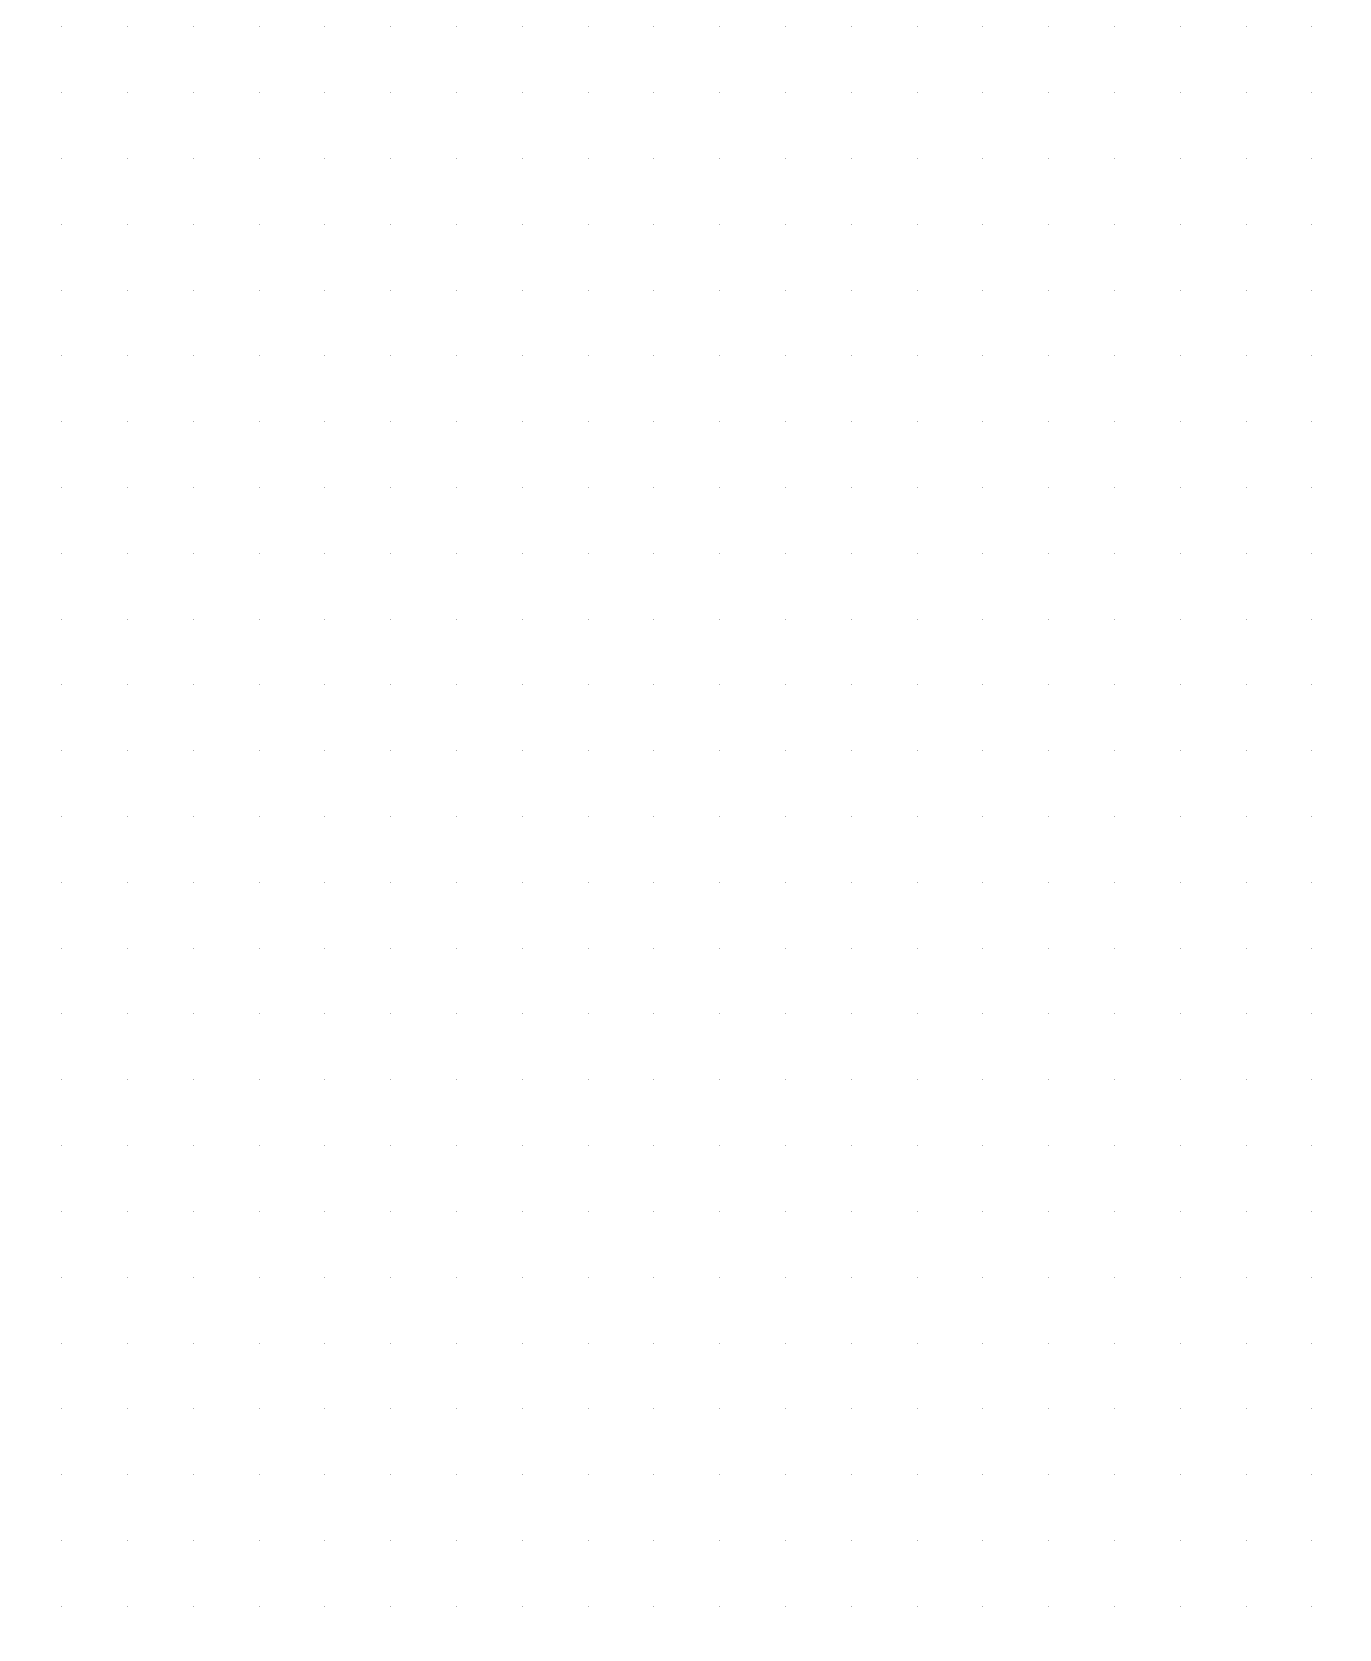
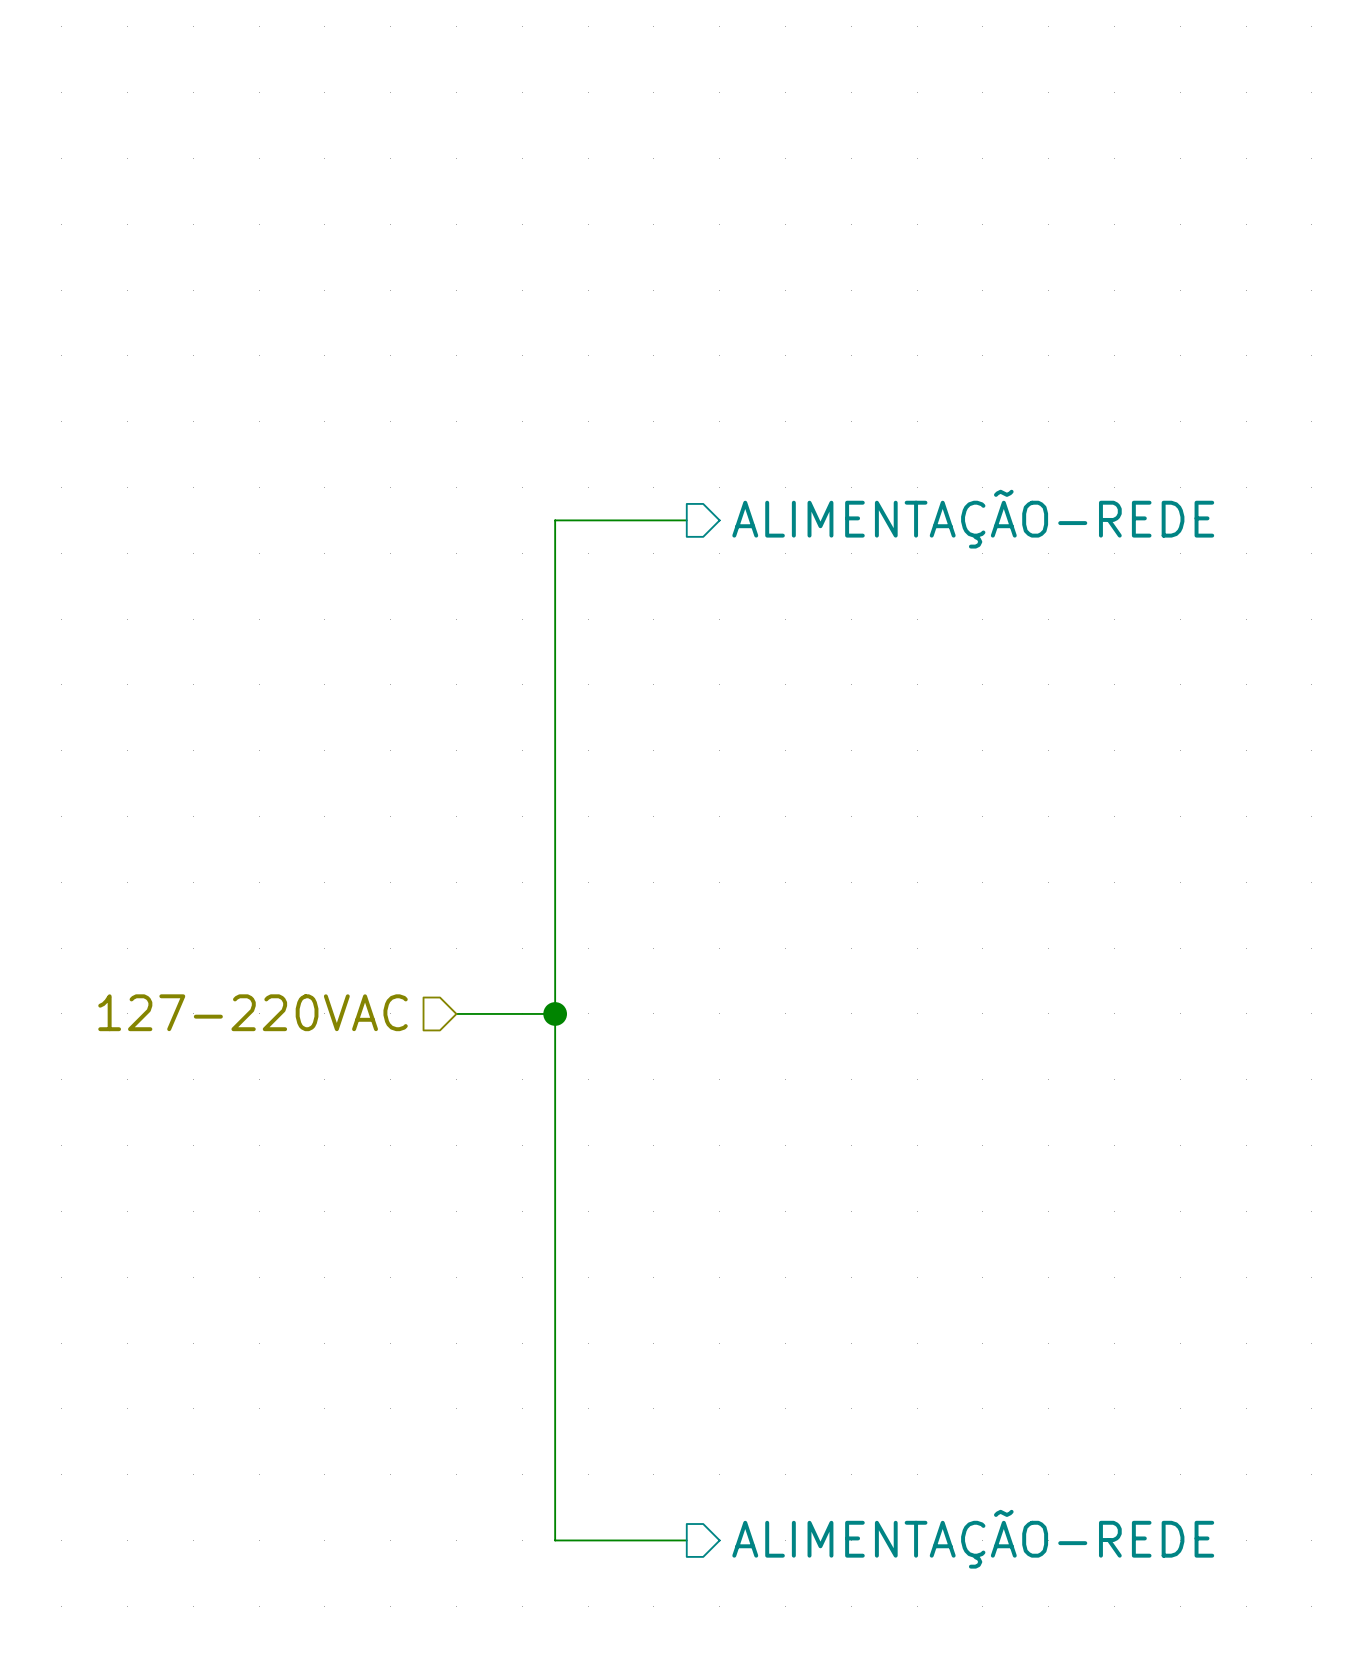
sheet pin: none -> ALIMENTAÇÃO-REDE (973, 519)
wire: none -> (686, 520) (555, 520) (555, 1540) (686, 1540)
hierarchical label: none -> 127-220VAC (253, 1012)
wire: none -> (456, 1013) (555, 1013)
junction: none -> (555, 1013)
sheet pin: none -> ALIMENTAÇÃO-REDE (973, 1539)

